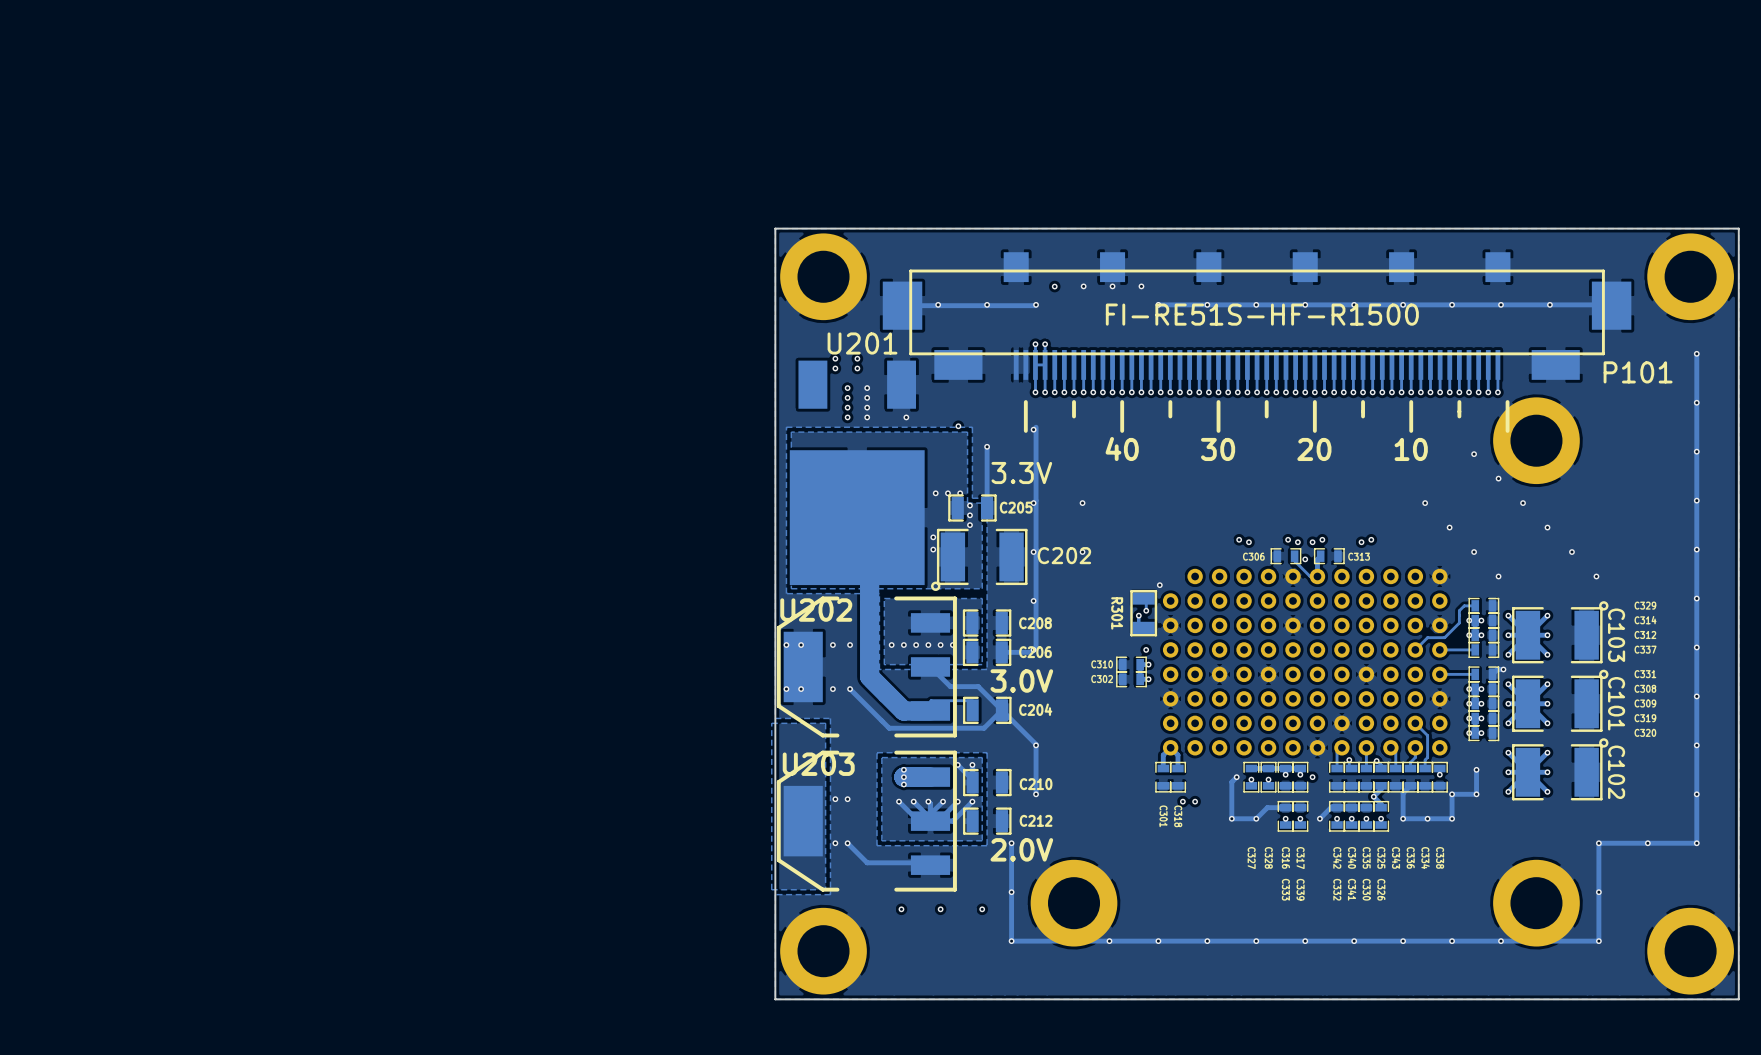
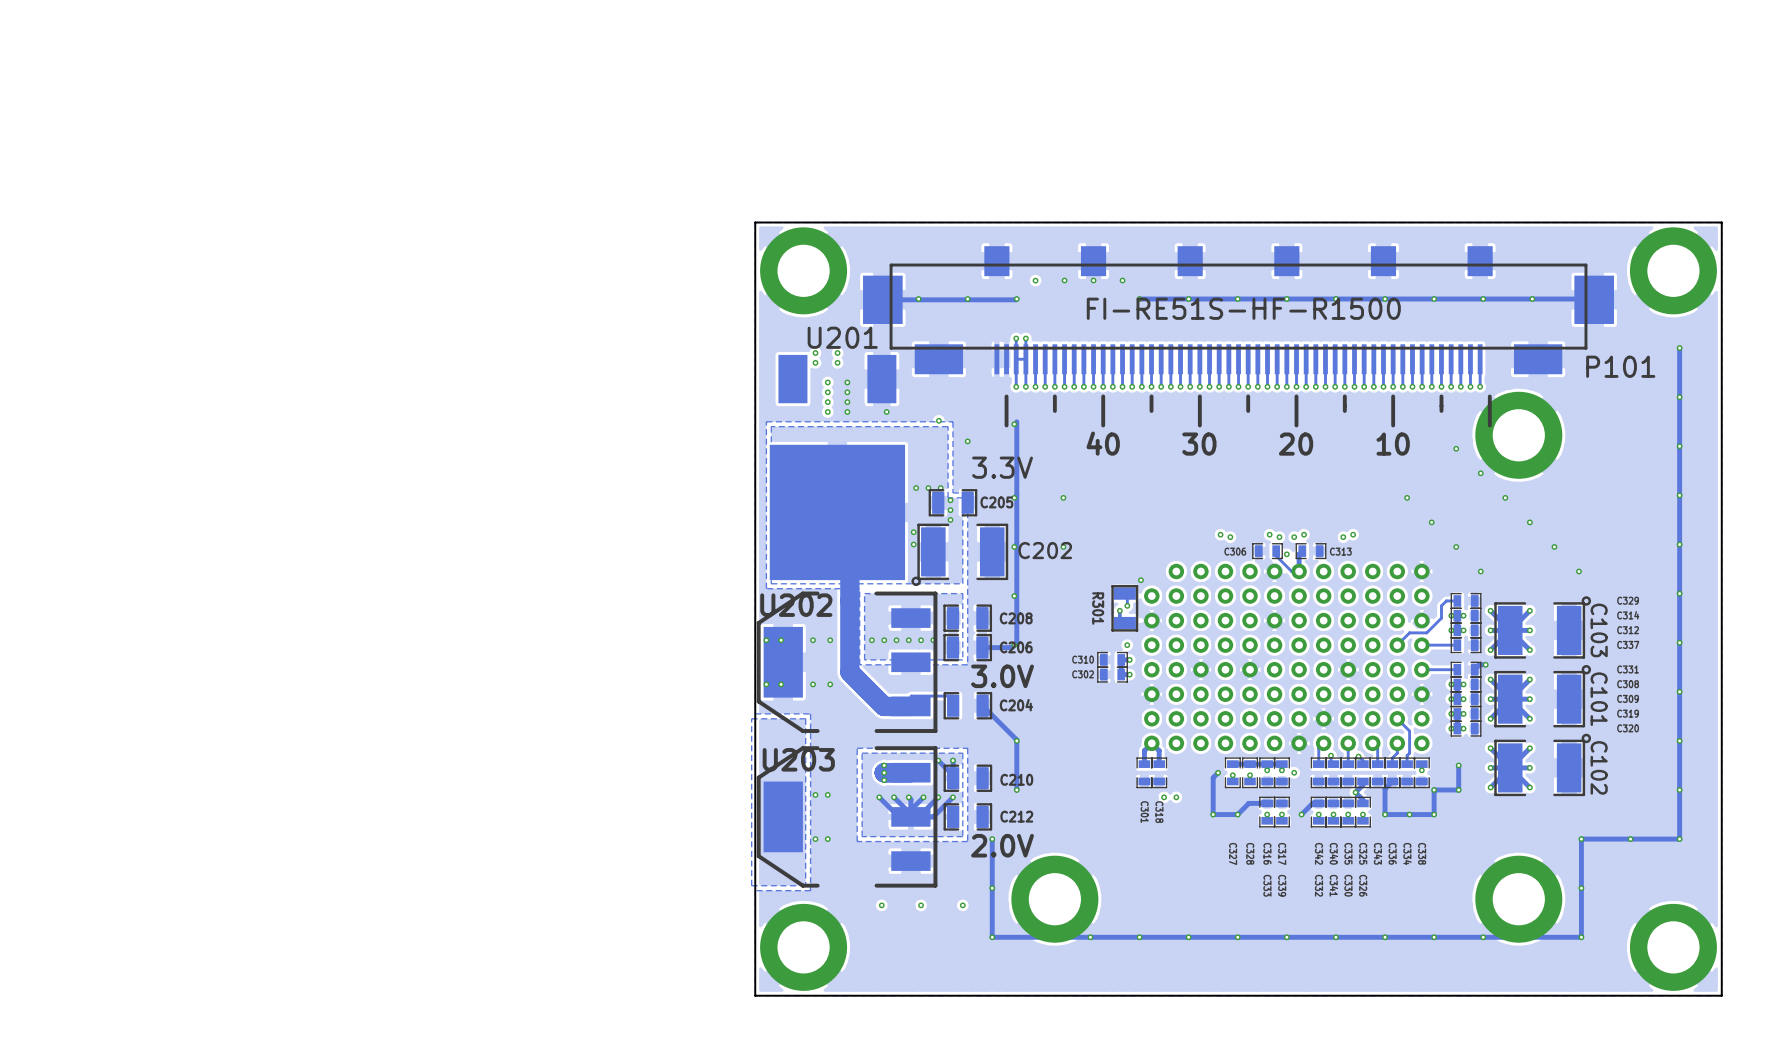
track: (987, 446) (987, 507) -> none
track: (930, 666) (950, 686) (978, 686) (1001, 710) (984, 728) (889, 728) (850, 689) -> none
track: (847, 843) (867, 862) (928, 862) (930, 865) -> none

